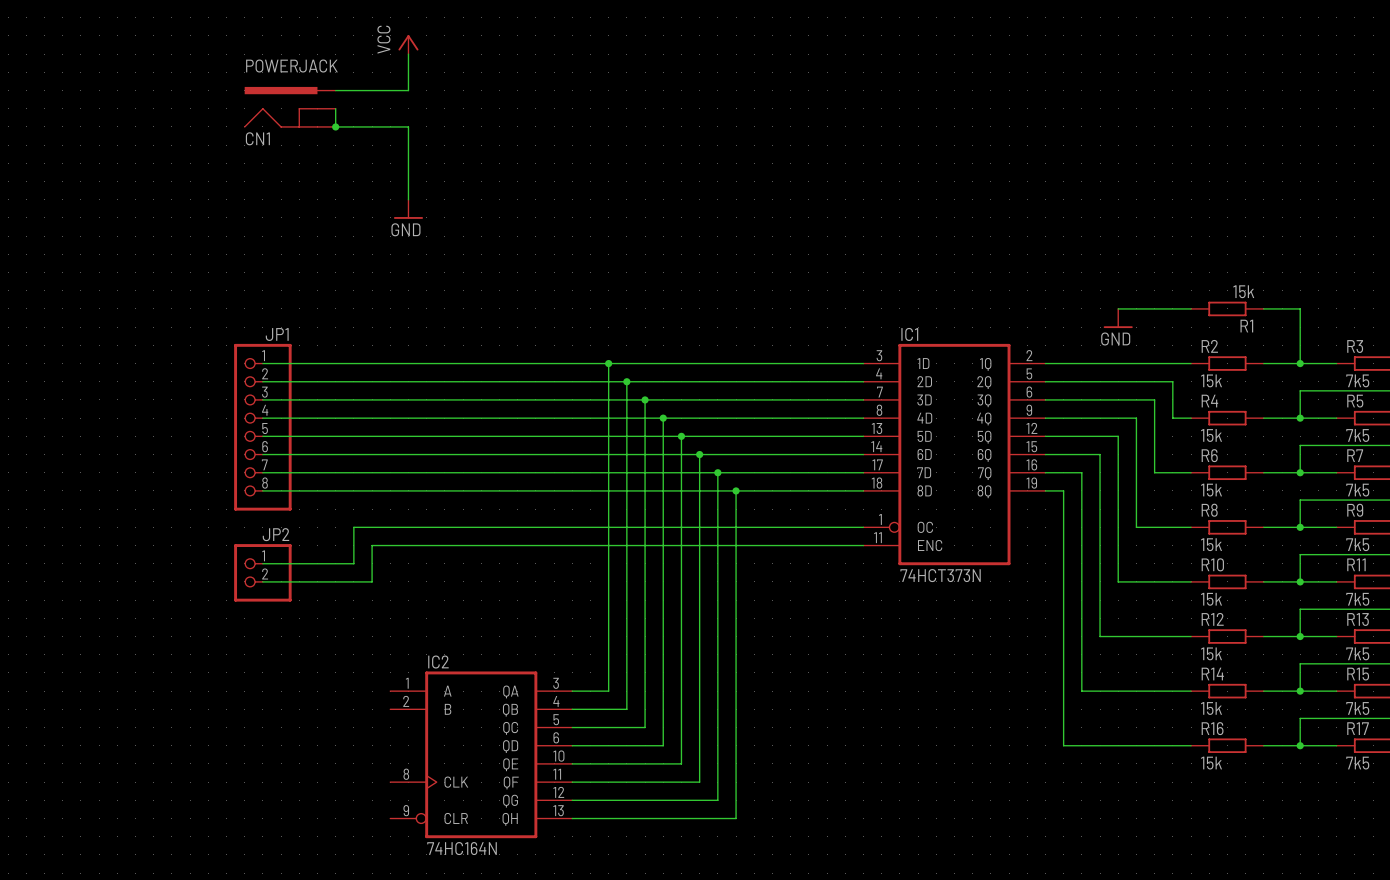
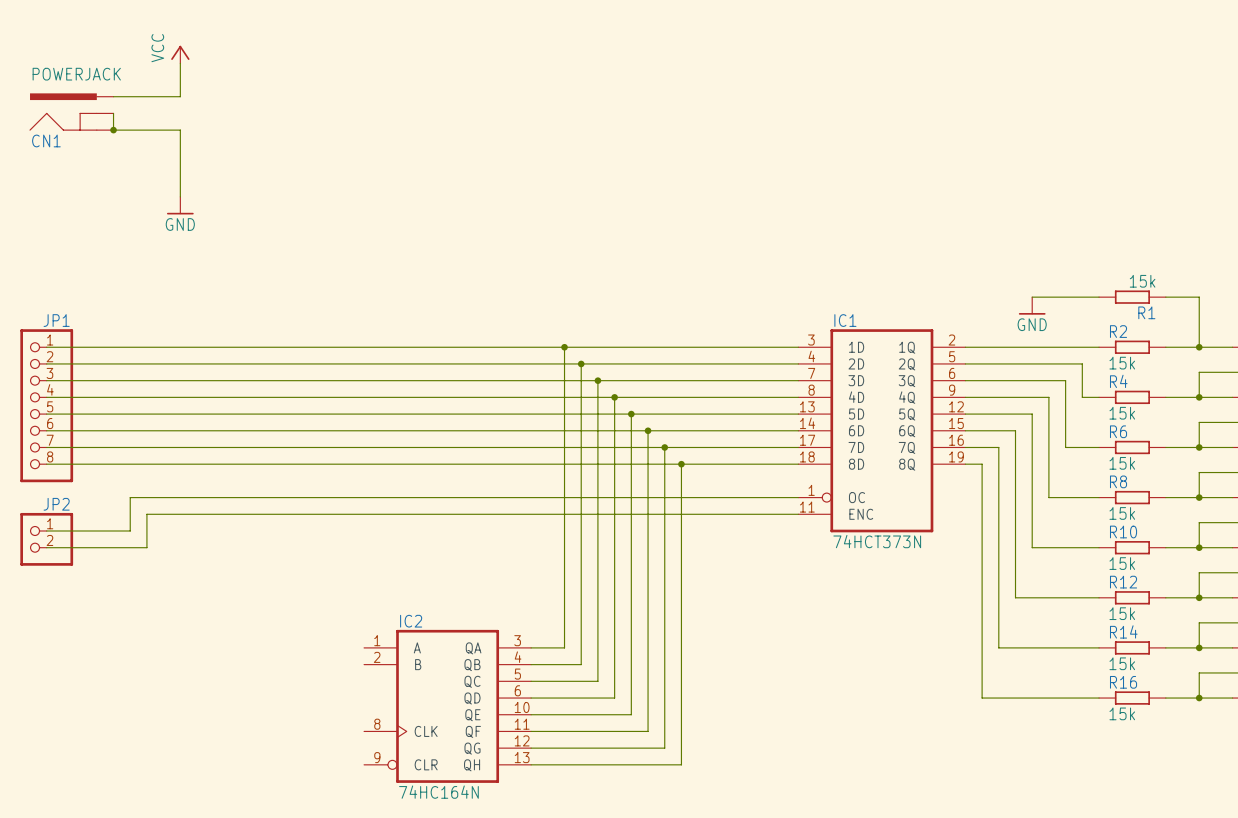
power symbol: none -> VCC (180, 54)
power symbol: VCC (408, 44) -> none
wire: none -> (180, 63) (180, 96) (113, 96)
wire: (408, 54) (408, 90) (335, 90) -> none
CN1 position: (289, 107) -> (71, 111)
wire: none -> (113, 113) (113, 130) (180, 130) (180, 196)
wire: (335, 108) (335, 126) (408, 126) (408, 199) -> none
junction: none -> (113, 130)
junction: (335, 126) -> none
power symbol: none -> GND (180, 205)
power symbol: GND (408, 209) -> none
wire: none -> (46, 347) (247, 347)
wire: none -> (46, 363) (247, 363)
wire: none -> (46, 380) (247, 380)
wire: none -> (46, 397) (247, 397)
JP1 position: (262, 427) -> (46, 405)
wire: none -> (46, 414) (247, 414)
wire: none -> (46, 430) (247, 430)
wire: none -> (46, 447) (247, 447)
wire: none -> (46, 464) (247, 464)
wire: (353, 527) (353, 563) (262, 563) -> (330, 497) (130, 497) (130, 530) (46, 530)
wire: (372, 545) (372, 581) (262, 581) -> (347, 514) (146, 514) (146, 547) (46, 547)
JP2 position: (262, 572) -> (46, 539)

